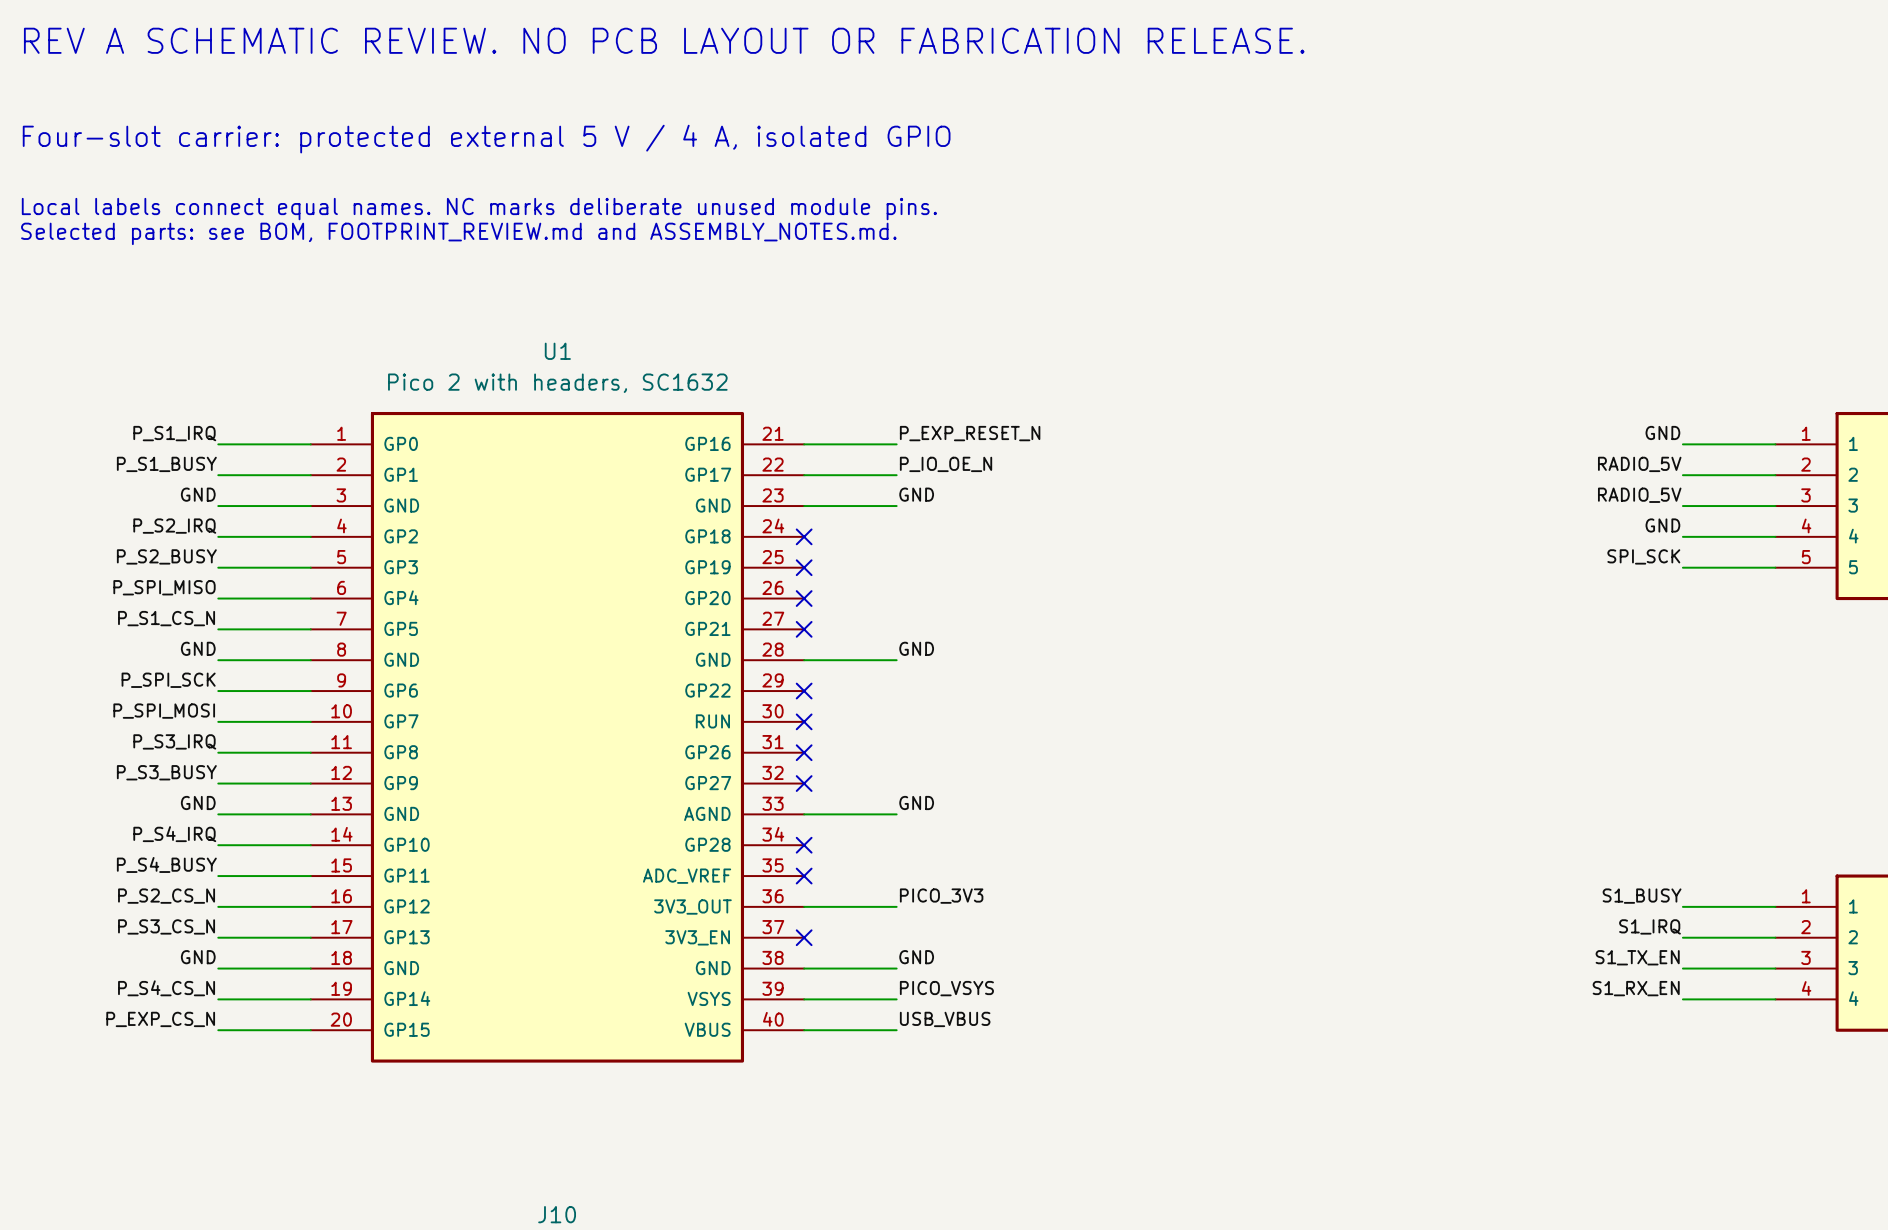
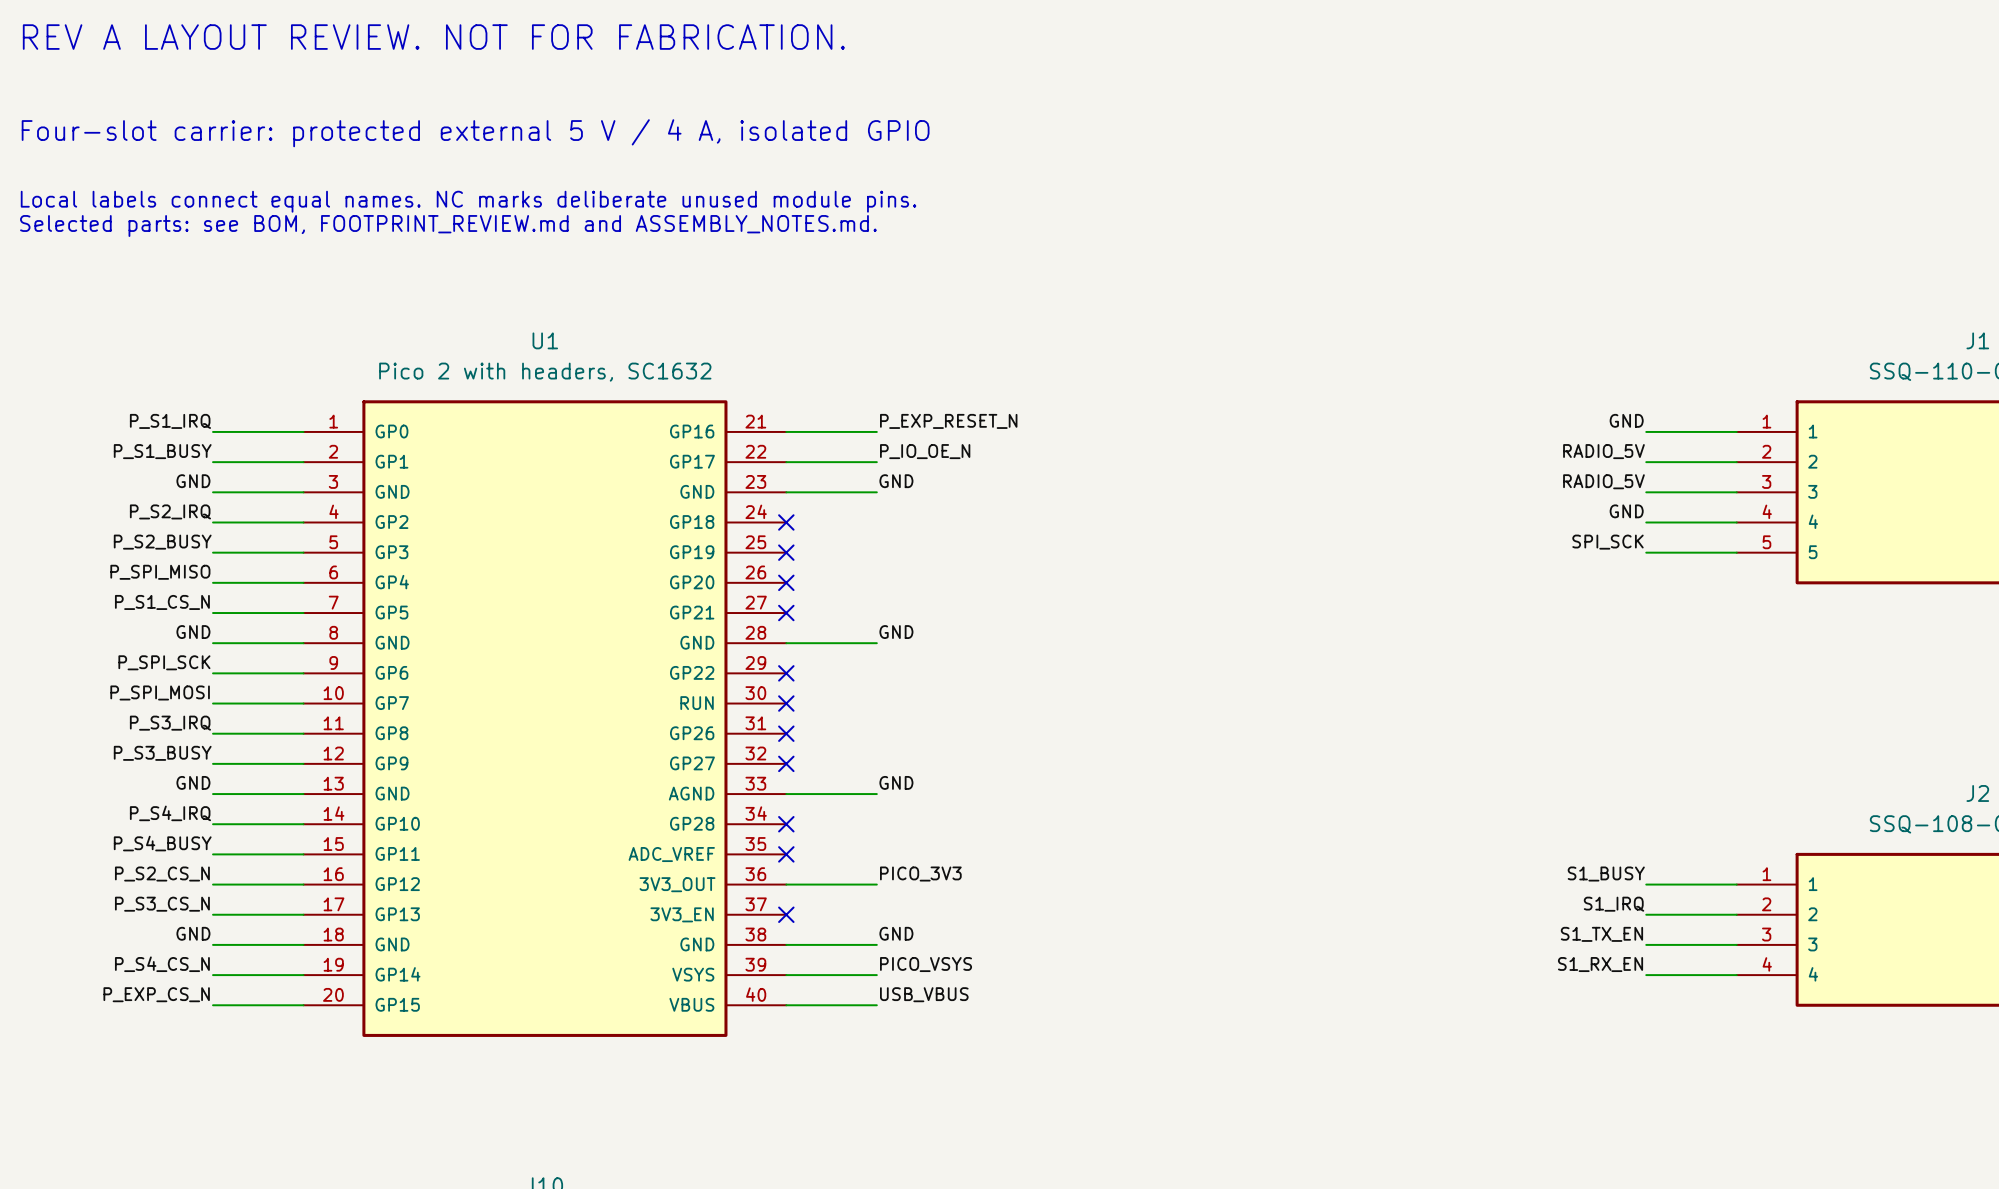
text: REV A SCHEMATIC REVIEW. NO PCB LAYOUT OR FABRICATION RELEASE. (664, 40) -> REV A LAYOUT REVIEW. NOT FOR FABRICATION. (433, 37)

